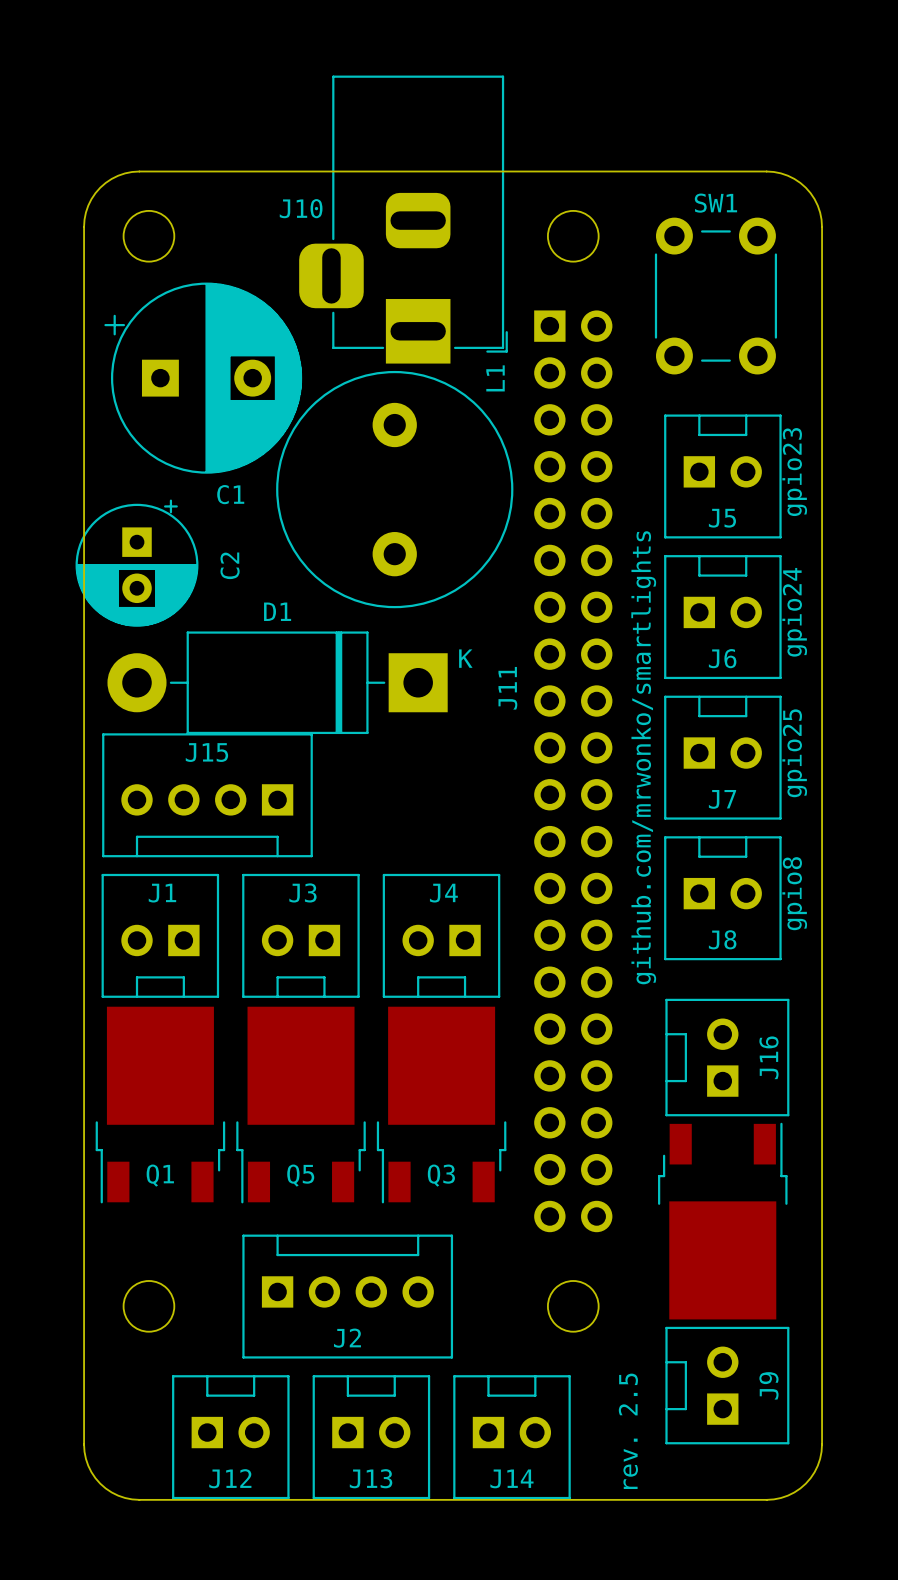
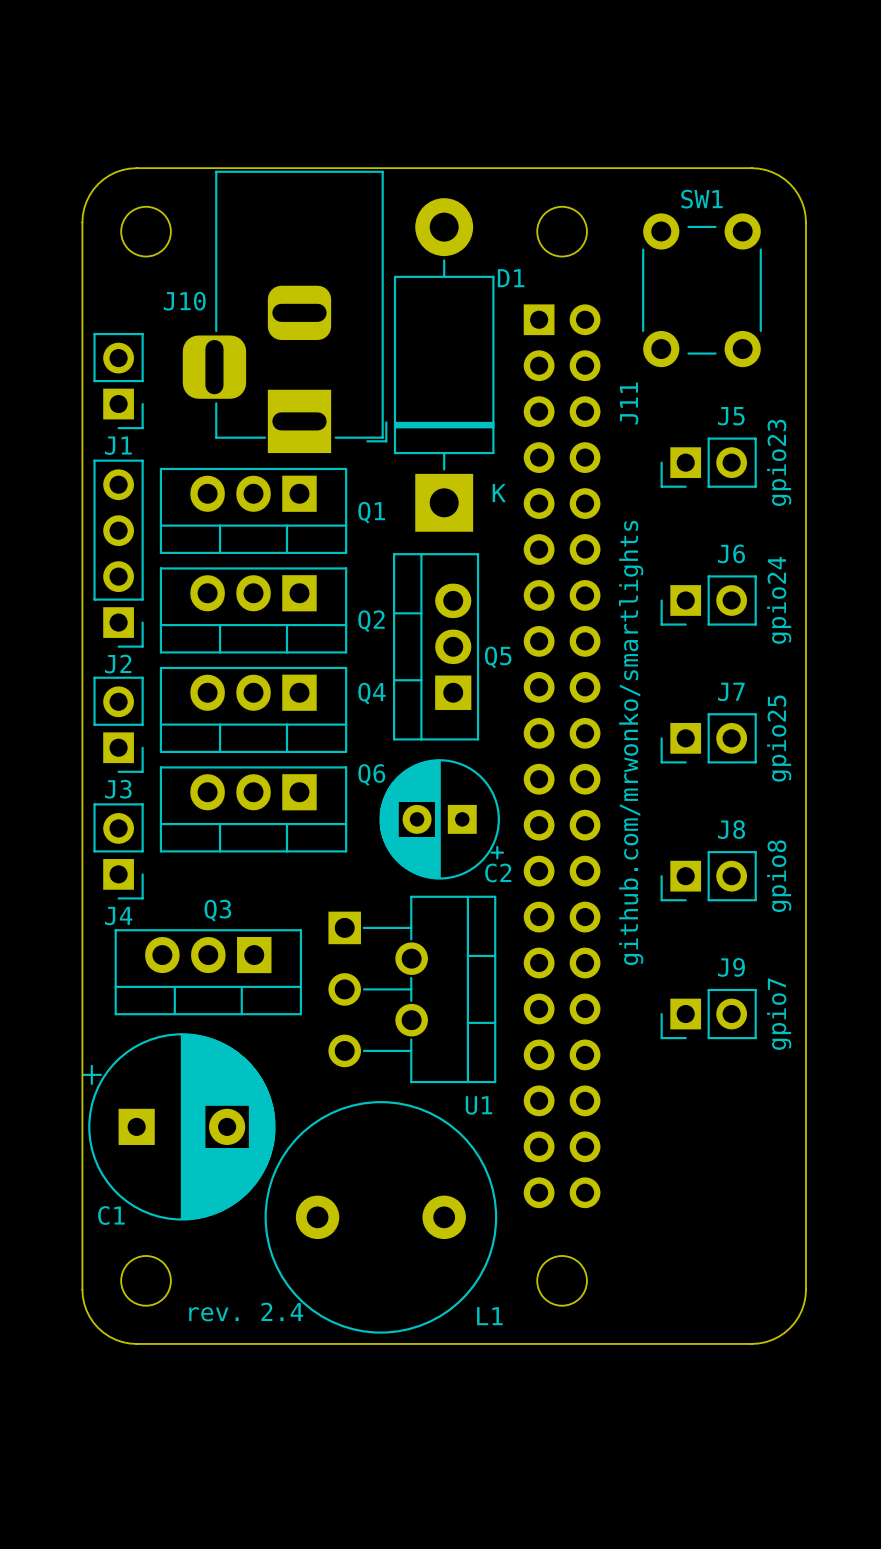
J10 position: (403, 219) -> (285, 311)
C1 position: (203, 378) -> (178, 1126)
J5 footprint: [664, 414, 782, 539] -> [660, 437, 757, 488]
L1 rotation: 0° (394, 489) -> 90° clockwise (380, 1217)
L1 position: (394, 489) -> (380, 1217)
C1 name position: C1 (230, 494) -> C1 (111, 1215)
J5 name position: J5 (722, 518) -> J5 (731, 416)
J6 footprint: [664, 555, 782, 680] -> [660, 575, 757, 626]
C2 rotation: 0° (137, 563) -> 90° clockwise (441, 819)
C2 position: (137, 563) -> (441, 819)
C2 name position: C2 (230, 565) -> C2 (498, 872)
D1 name position: D1 (277, 611) -> D1 (511, 278)
Q2: none -> (253, 610)
D1 footprint: [107, 631, 448, 735] -> [393, 198, 495, 532]
J6 name position: J6 (722, 658) -> J6 (731, 553)
J11 name position: J11 (507, 688) -> J11 (629, 403)
J7 footprint: [664, 695, 782, 820] -> [660, 713, 757, 764]
Q4: none -> (253, 709)
J15: (207, 795) -> none
J7 name position: J7 (722, 799) -> J7 (731, 691)
Q6: none -> (253, 809)
J8 footprint: [664, 836, 782, 961] -> [660, 851, 757, 902]
J1 footprint: [101, 873, 220, 998] -> [93, 332, 144, 430]
J3 footprint: [242, 873, 360, 998] -> [93, 676, 144, 773]
J4 footprint: [382, 873, 501, 998] -> [93, 803, 144, 900]
J3 name position: J3 (302, 892) -> J3 (118, 789)
J1 name position: J1 (162, 893) -> J1 (118, 445)
J4 name position: J4 (443, 893) -> J4 (118, 916)
J8 name position: J8 (722, 939) -> J8 (731, 829)
Q1 footprint: [95, 1006, 226, 1204] -> [159, 467, 348, 555]
Q5 footprint: [236, 1006, 366, 1204] -> [393, 553, 480, 741]
Q3 footprint: [376, 1006, 507, 1204] -> [114, 929, 303, 1016]
U1: none -> (412, 989)
text: none -> gpio7 (779, 1014)
J16: (727, 1057) -> none
Q1 name position: Q1 (160, 1175) -> Q1 (371, 512)
Q5 name position: Q5 (300, 1175) -> Q5 (498, 657)
Q3 name position: Q3 (441, 1175) -> Q3 (217, 910)
part: (722, 1221) -> none
J2 footprint: [242, 1234, 454, 1359] -> [93, 459, 144, 648]
board edge: (84, 1315) (84, 1444) (85, 1458) (91, 1472) (105, 1488) (118, 1495) (139, 1499) (766, 1499) (781, 1497) (794, 1492) (805, 1483) (814, 1472) (820, 1458) (822, 1444) (822, 1315) -> (82, 1289) (86, 1310) (98, 1328) (115, 1339) (136, 1343) (758, 1343) (778, 1336) (794, 1322) (801, 1310) (805, 1289)
J9 footprint: [665, 1326, 790, 1445] -> [660, 988, 757, 1040]
text: none -> rev. 2.4 (246, 1312)
J2 name position: J2 (347, 1338) -> J2 (118, 664)
J9 name position: J9 (768, 1385) -> J9 (731, 967)
text: rev. 2.5 (628, 1431) -> none
J12: (230, 1437) -> none
J13: (371, 1437) -> none
J14: (511, 1437) -> none

